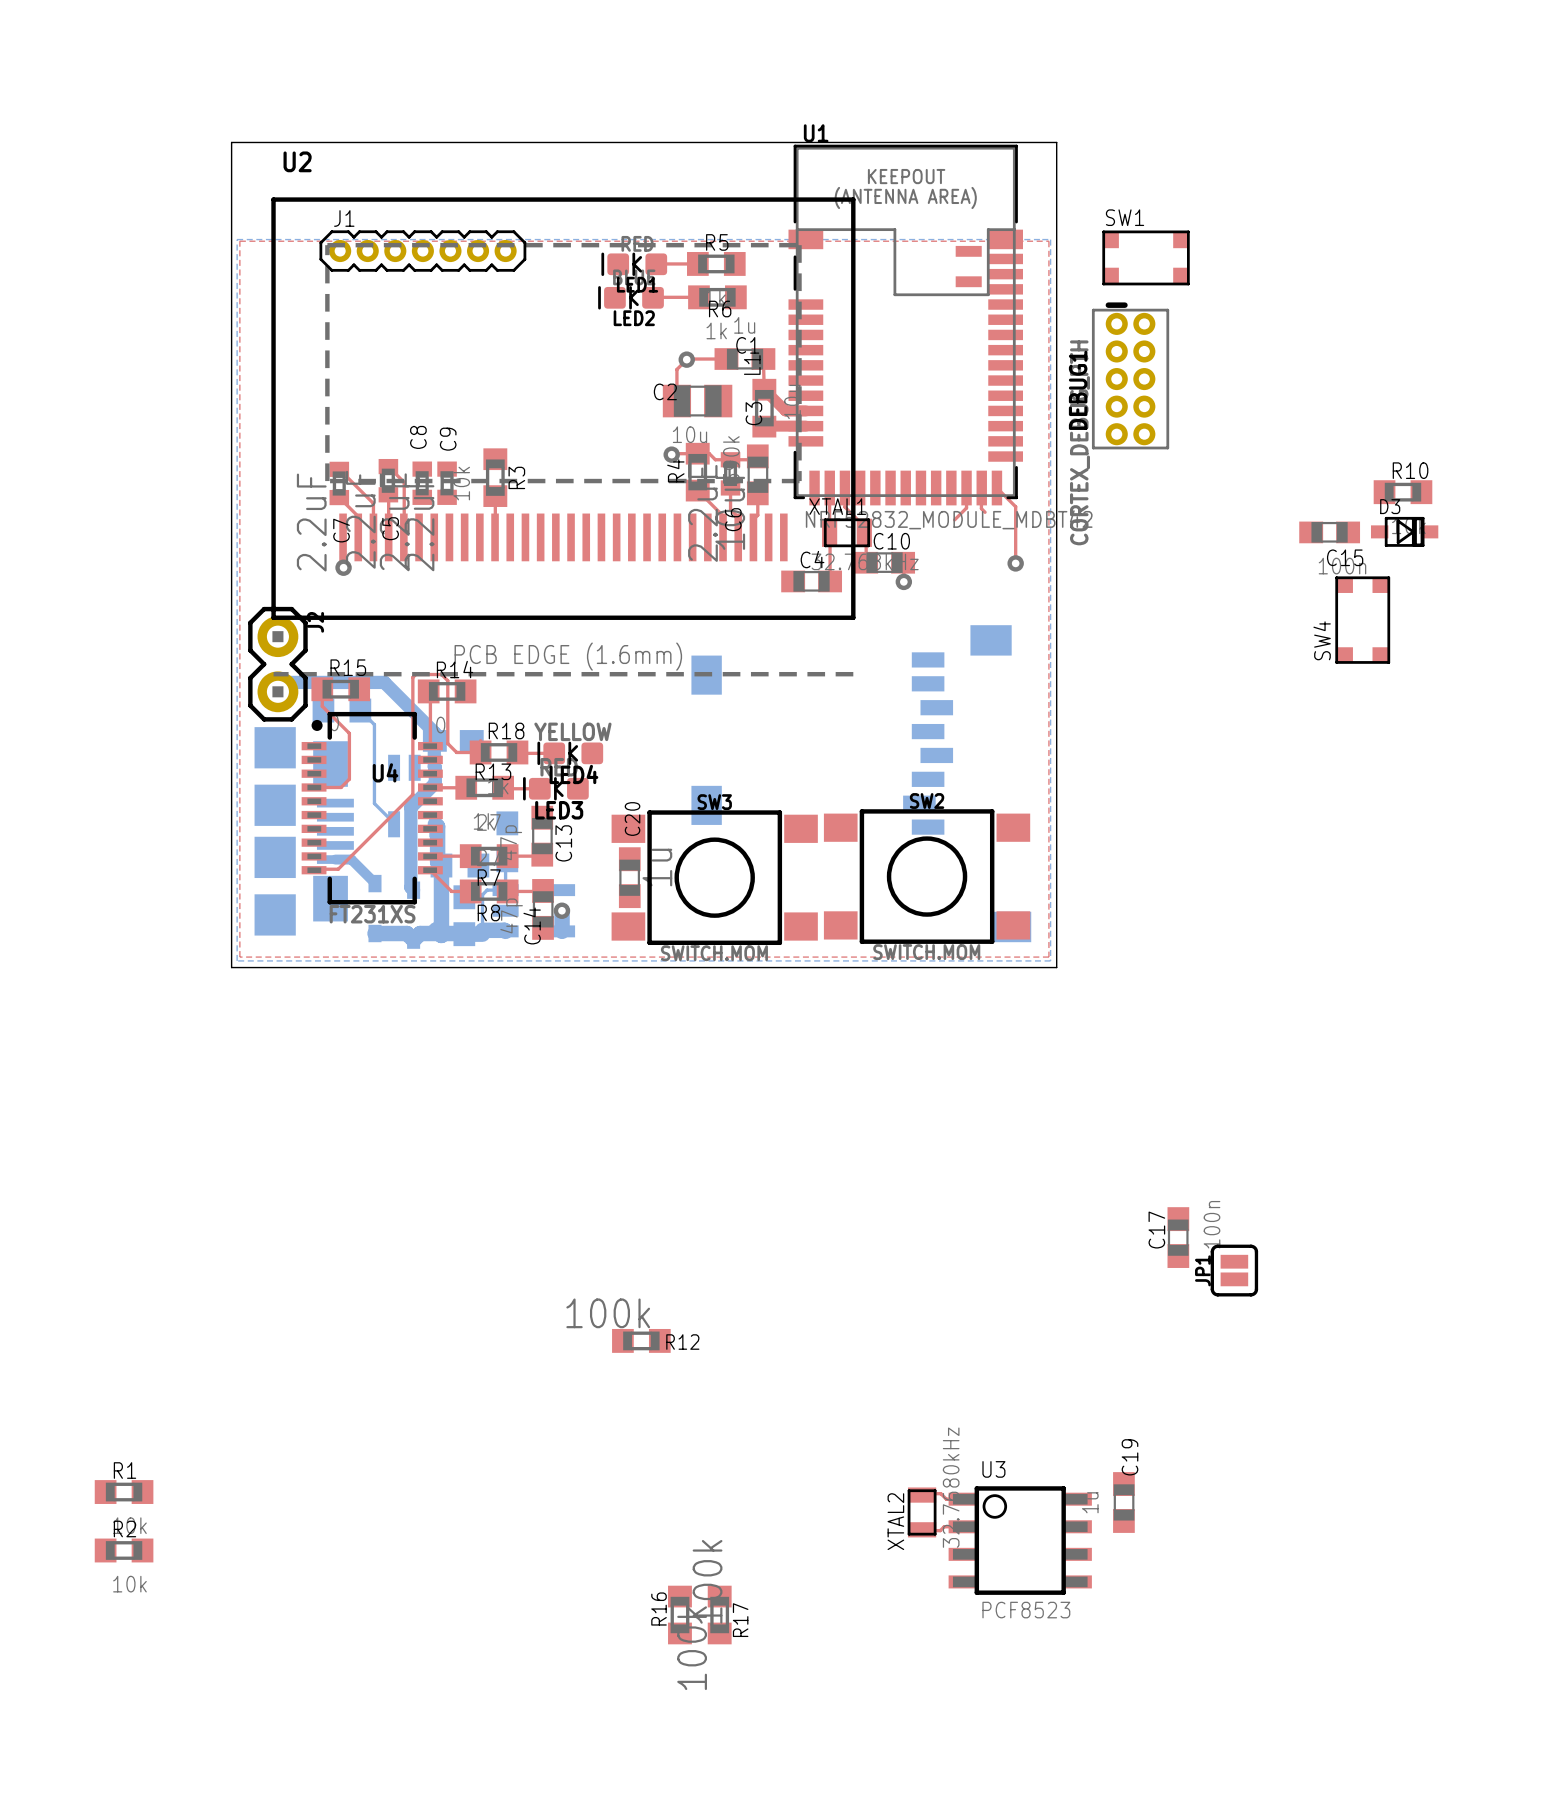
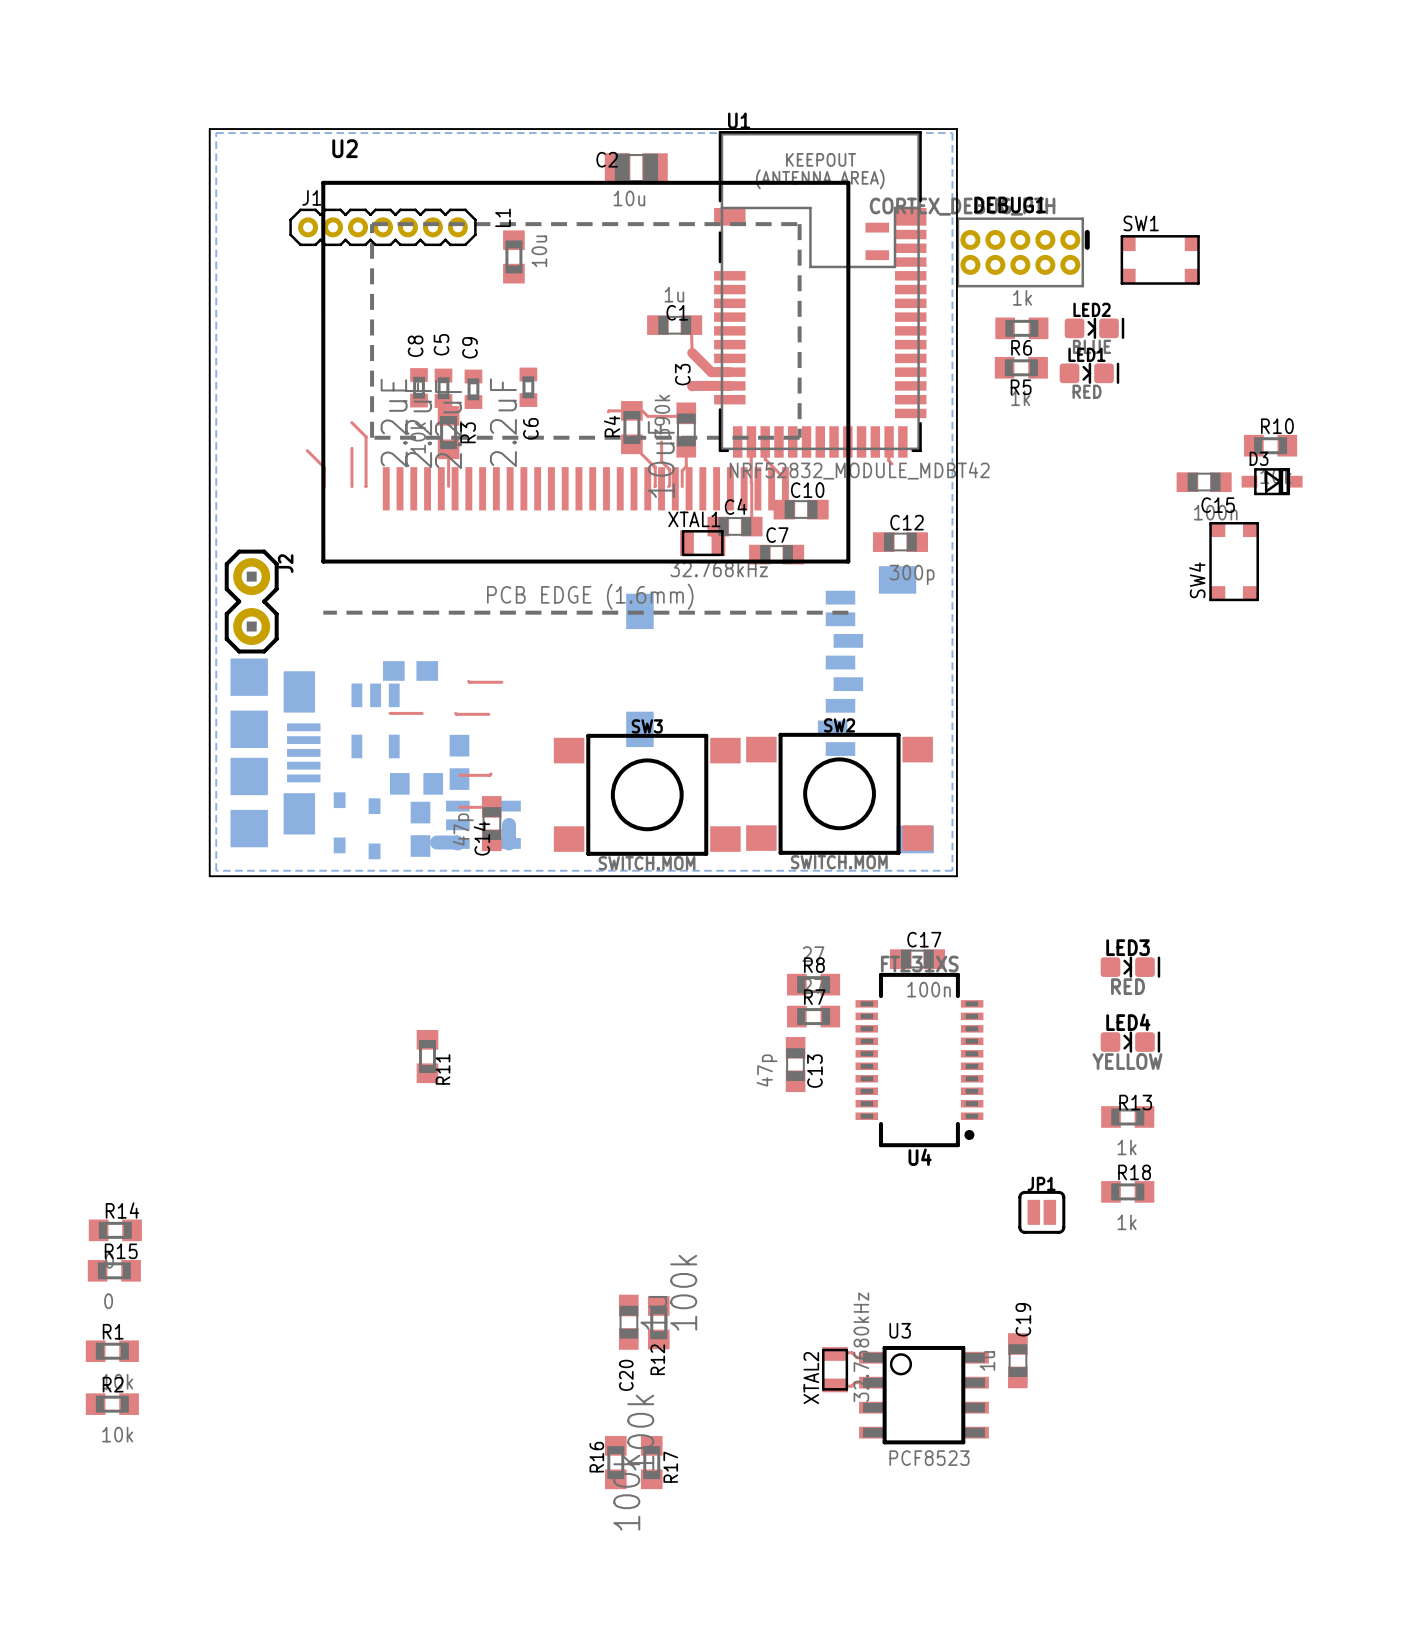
bottom zone outline: (237, 239) (1050, 239) (1050, 960) (237, 960) (237, 239) -> (216, 133) (216, 870) (952, 870) (952, 133) (216, 133)
top zone outline: (239, 241) (1048, 241) (1048, 957) (239, 957) (239, 241) -> none
R5 name position: R5 (717, 242) -> R5 (1021, 387)
SW1 position: (1146, 257) -> (1160, 259)
top track: (697, 263) (656, 264) -> none
R5 position: (716, 263) -> (1021, 367)
LED1 rotation: 0° (634, 264) -> 180° (1089, 373)
LED1 position: (634, 264) -> (1089, 373)
LED2 rotation: 0° (631, 297) -> 180° (1094, 328)
LED2 position: (631, 297) -> (1094, 328)
top track: (698, 297) (653, 297) -> none
R6 position: (717, 297) -> (1021, 328)
R6 name position: R6 (720, 309) -> R6 (1021, 347)
R6 value position: 1k (716, 330) -> 1k (1022, 297)
via: (686, 359) -> none
top track: (726, 359) (687, 359) (676, 369) (676, 401) -> none
DEBUG1 rotation: 0° (1130, 375) -> 90° clockwise (1023, 252)
DEBUG1 position: (1130, 375) -> (1023, 252)
C2 position: (697, 401) -> (636, 168)
L1 position: (764, 408) -> (513, 256)
U2 position: (563, 436) -> (585, 397)
C9 name position: C9 (448, 439) -> C9 (469, 347)
via: (671, 454) -> none
C7 footprint: [329, 461, 350, 506] -> [749, 544, 805, 565]
top track: (339, 469) (373, 503) (373, 537) -> none
C6 position: (730, 473) -> (528, 387)
C5 position: (388, 480) -> (443, 388)
C8 position: (422, 483) -> (419, 387)
C9 position: (447, 483) -> (473, 389)
top track: (966, 488) (966, 507) (954, 519) -> none
top track: (996, 488) (1015, 506) (1015, 563) (1014, 562) -> none
C7 value: 2.2uF (311, 522) -> none
C5 name position: C5 (390, 528) -> C5 (441, 344)
C7 name position: C7 (341, 530) -> C7 (777, 535)
XTAL1 position: (846, 532) -> (702, 543)
via: (1015, 563) -> none
via: (343, 567) -> none
via: (903, 581) -> none
C12: none -> 300p (900, 542)
bottom track: (274, 687) (277, 691) (287, 682) (384, 682) (434, 732) (435, 783) (410, 807) (410, 887) (413, 890) -> none
top track: (322, 689) (322, 706) (349, 733) (349, 779) (341, 787) (314, 787) -> none
R15 position: (340, 689) -> (114, 1270)
top track: (428, 691) (430, 691) (430, 746) -> none
R14 position: (447, 691) -> (115, 1230)
R11 side: bottom (341, 710) -> top (427, 1056)
bottom track: (360, 710) (374, 724) (374, 803) (394, 824) -> none
top track: (480, 740) (480, 752) (456, 752) (447, 743) (447, 680) (441, 674) (415, 674) (412, 677) (412, 794) (338, 869) (314, 870) -> none
R18 position: (499, 752) -> (1127, 1191)
LED4 rotation: 0° (570, 753) -> 180° (1130, 1042)
LED4 position: (570, 753) -> (1130, 1042)
U4 name position: U4 (385, 772) -> U4 (920, 1157)
R13 position: (484, 787) -> (1127, 1116)
LED3 rotation: 0° (555, 788) -> 180° (1130, 967)
LED3 position: (555, 788) -> (1130, 967)
U4 rotation: 0° (372, 808) -> 180° (919, 1060)
U4 position: (372, 808) -> (919, 1060)
C20 name position: C20 (632, 819) -> C20 (626, 1375)
bottom track: (435, 824) (437, 826) (437, 861) (441, 865) (441, 935) (435, 929) -> none
C13 position: (542, 836) -> (795, 1064)
top track: (430, 856) (470, 856) -> none
R7 position: (489, 856) -> (813, 1016)
bottom track: (335, 859) (351, 859) (374, 883) -> none
bottom track: (507, 860) (505, 862) (505, 890) (487, 890) (482, 894) (482, 934) (420, 933) (413, 940) (406, 933) (374, 933) -> none
top track: (430, 870) (451, 891) (470, 891) -> none
R7 name position: R7 (489, 877) -> R7 (814, 997)
C20 position: (629, 877) -> (628, 1322)
R8 position: (489, 891) -> (813, 984)
via: (561, 910) -> none
R8 name position: R8 (488, 912) -> R8 (814, 965)
C17 rotation: 0° (1178, 1237) -> 90° clockwise (917, 959)
C17 position: (1178, 1237) -> (917, 959)
JP1 rotation: 0° (1234, 1270) -> 90° clockwise (1041, 1212)
JP1 position: (1234, 1270) -> (1041, 1212)
R12 rotation: 0° (641, 1340) -> 90° clockwise (658, 1322)
R12 position: (641, 1340) -> (658, 1322)

